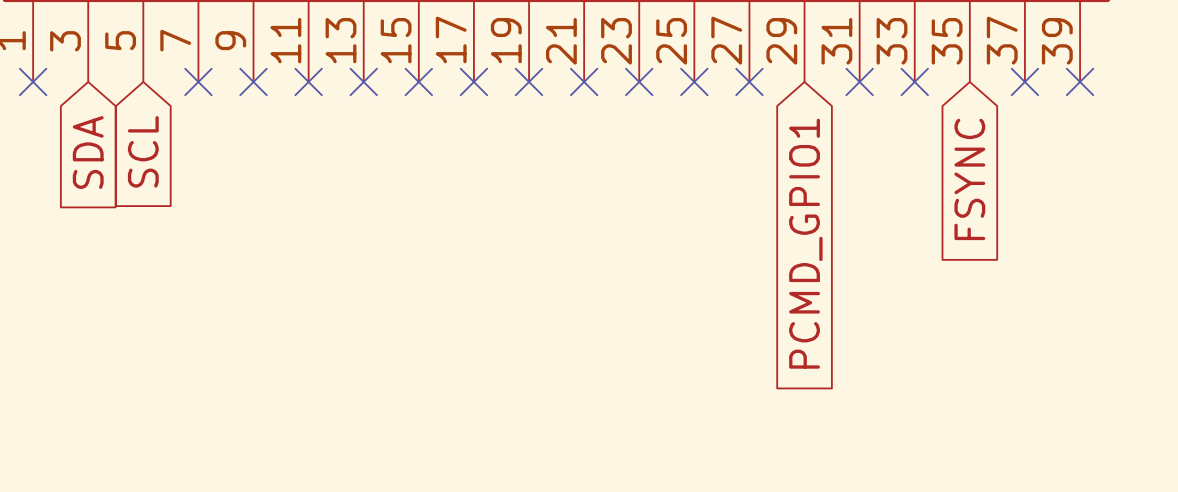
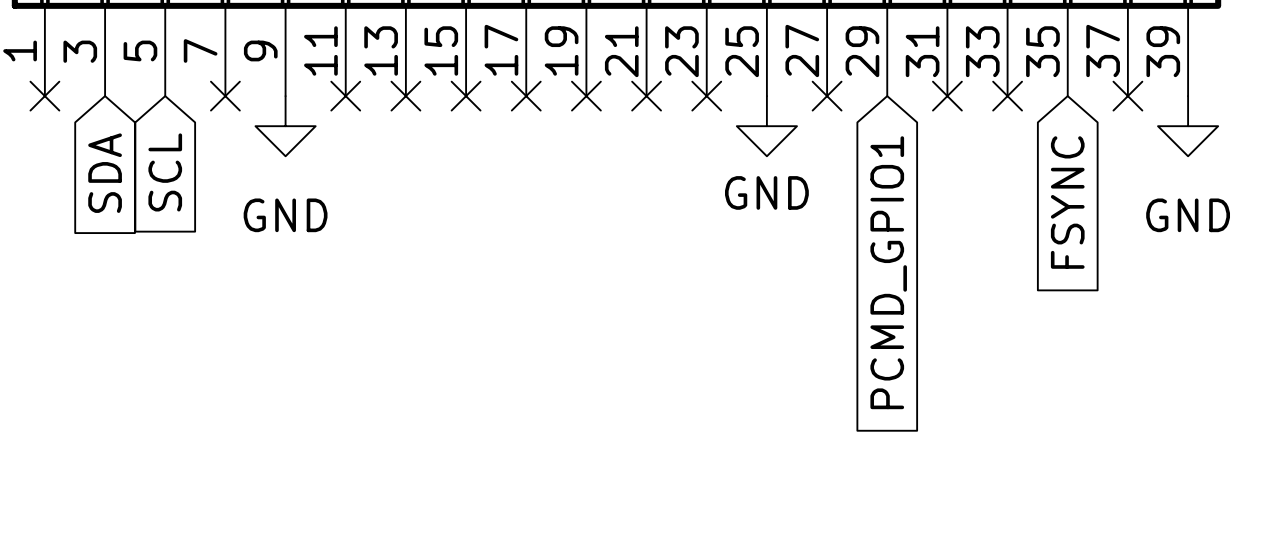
no-connect mark: (253, 81) -> none
no-connect mark: (694, 81) -> none
no-connect mark: (1080, 81) -> none
power symbol: none -> GND (285, 126)
power symbol: none -> GND (766, 126)
power symbol: none -> GND (1188, 126)

